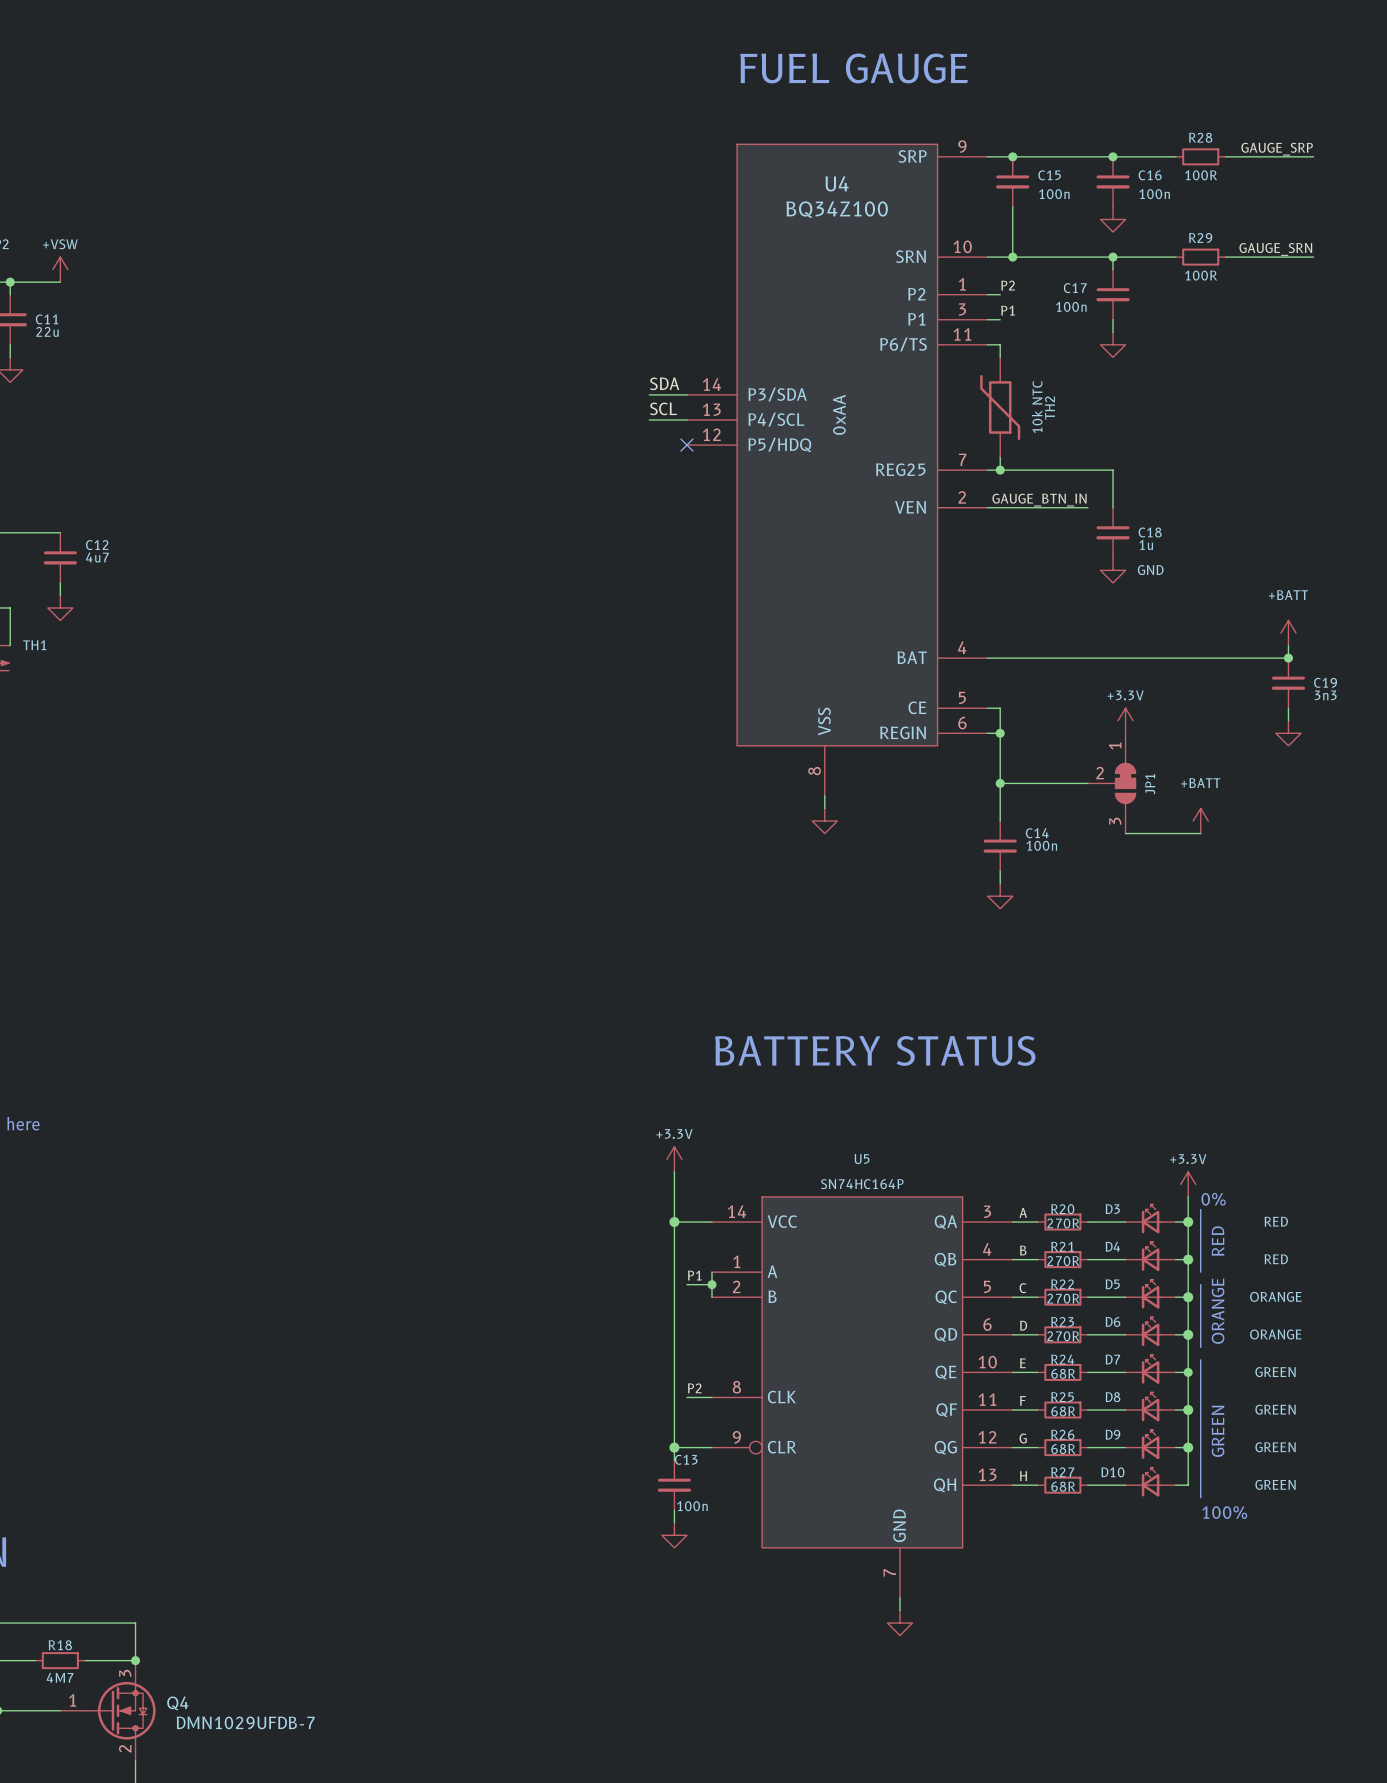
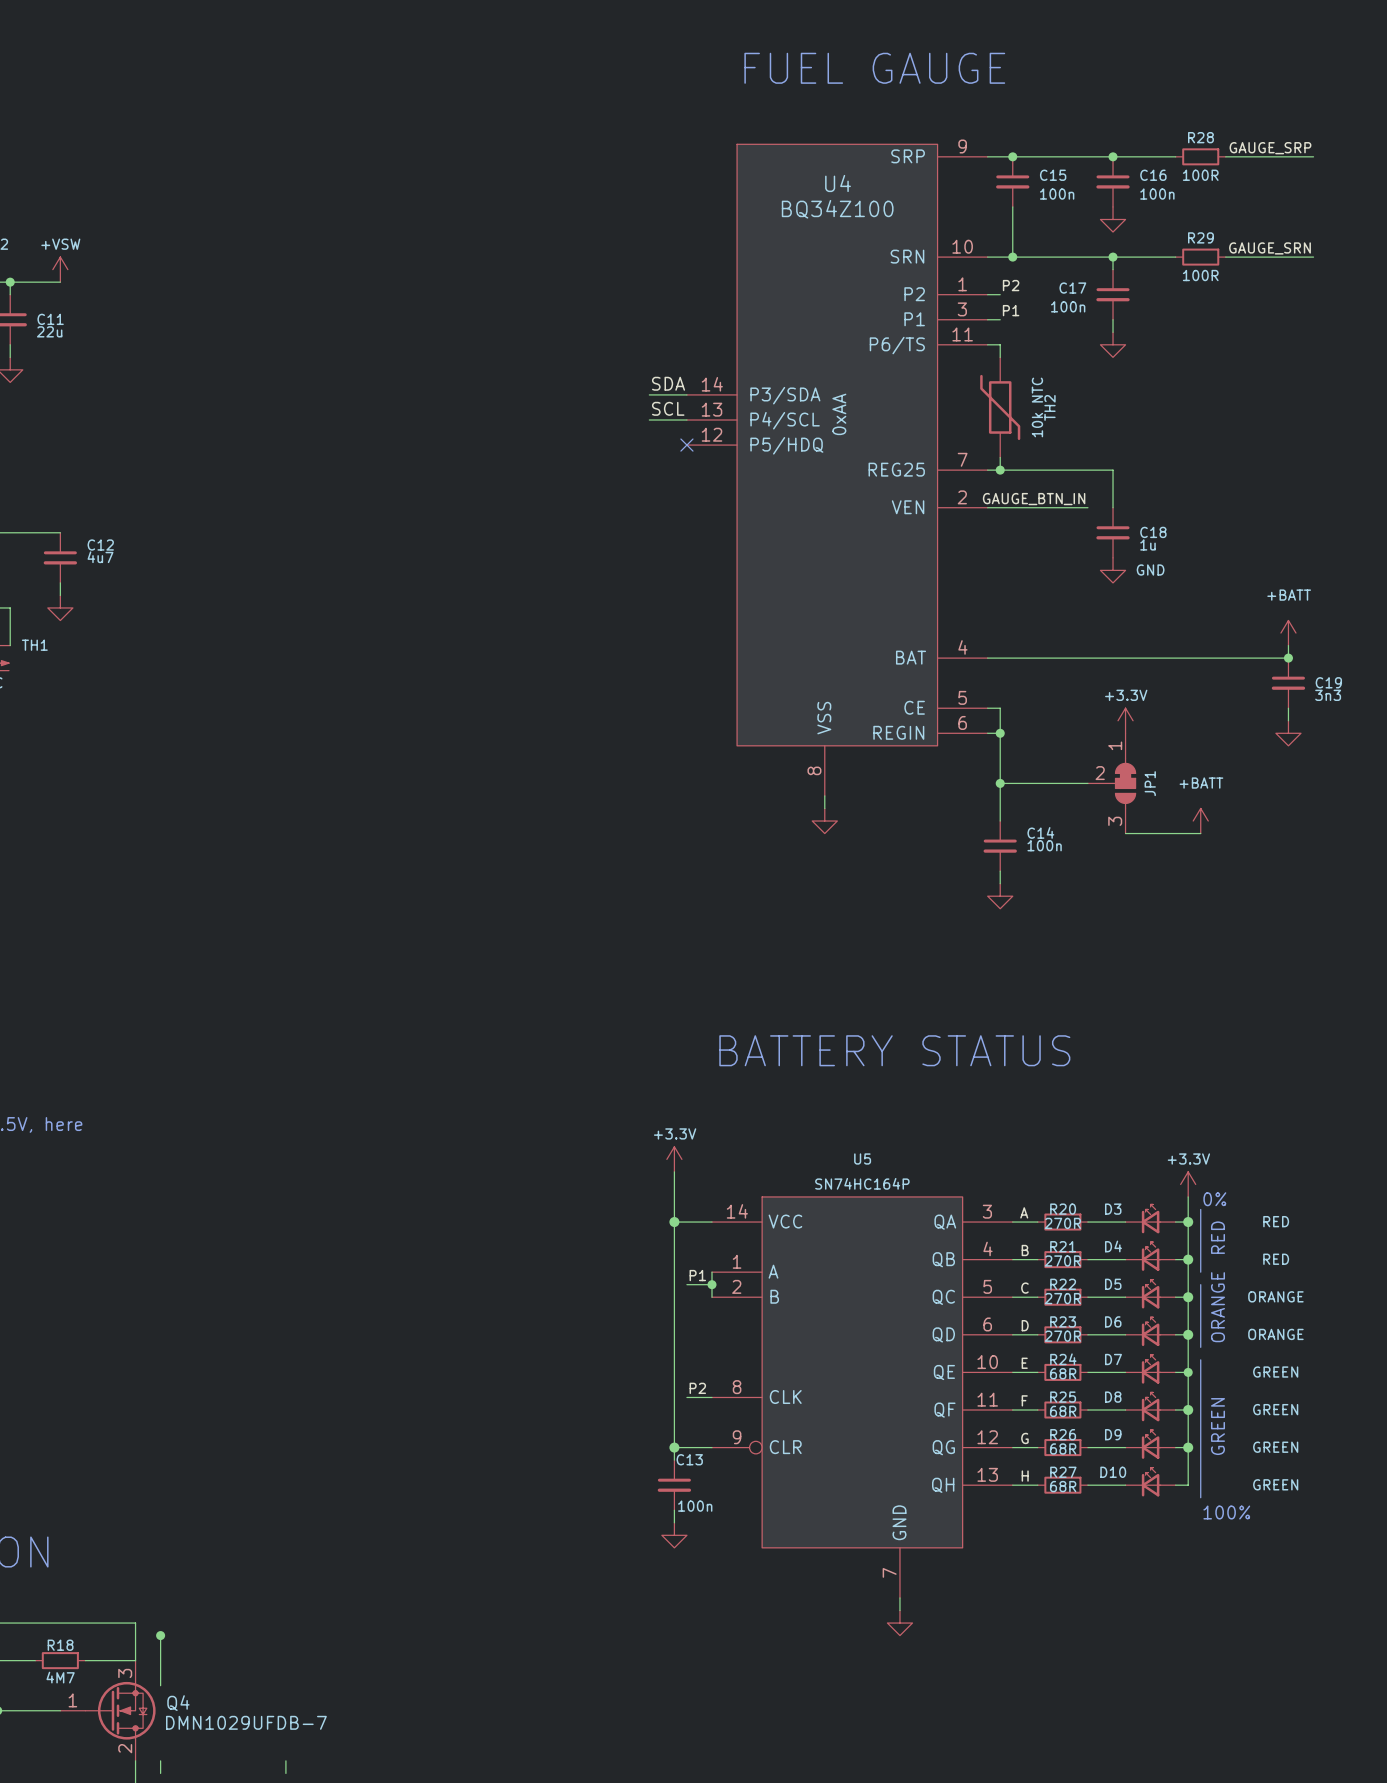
wire: none -> (160, 1635) (160, 1685)
junction position: (135, 1660) -> (160, 1635)
wire: none -> (160, 1760) (160, 1773)
wire: none -> (285, 1760) (285, 1773)

